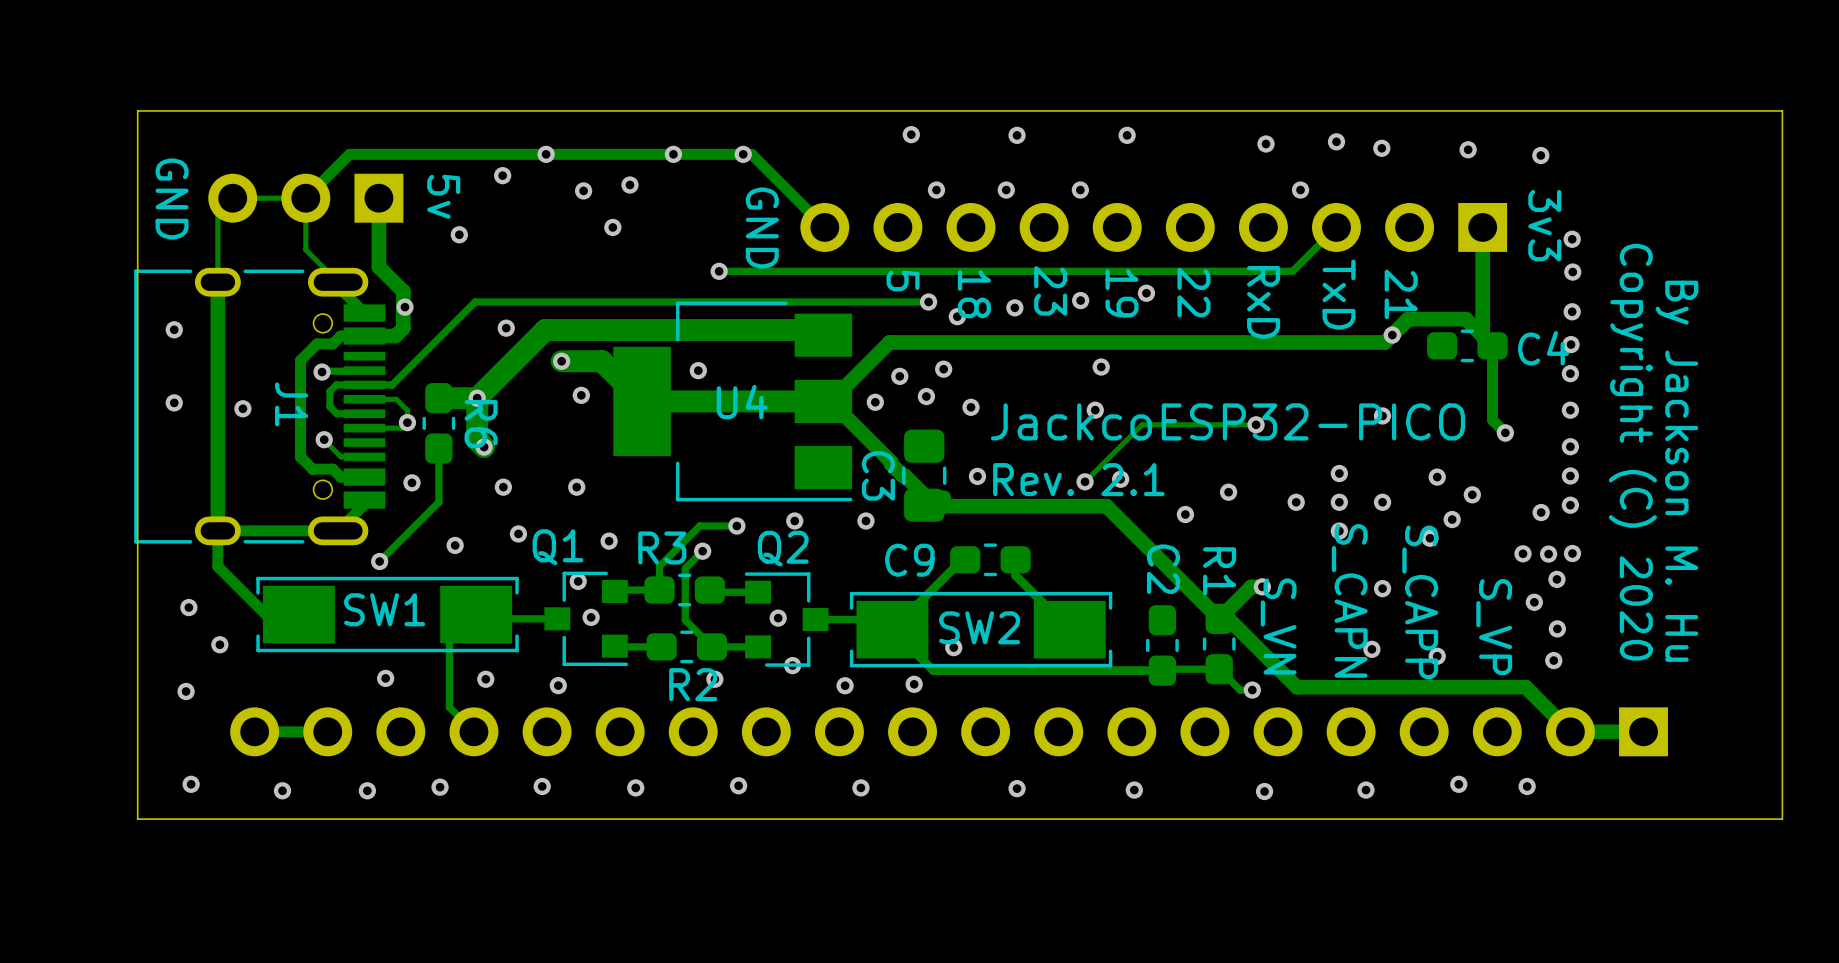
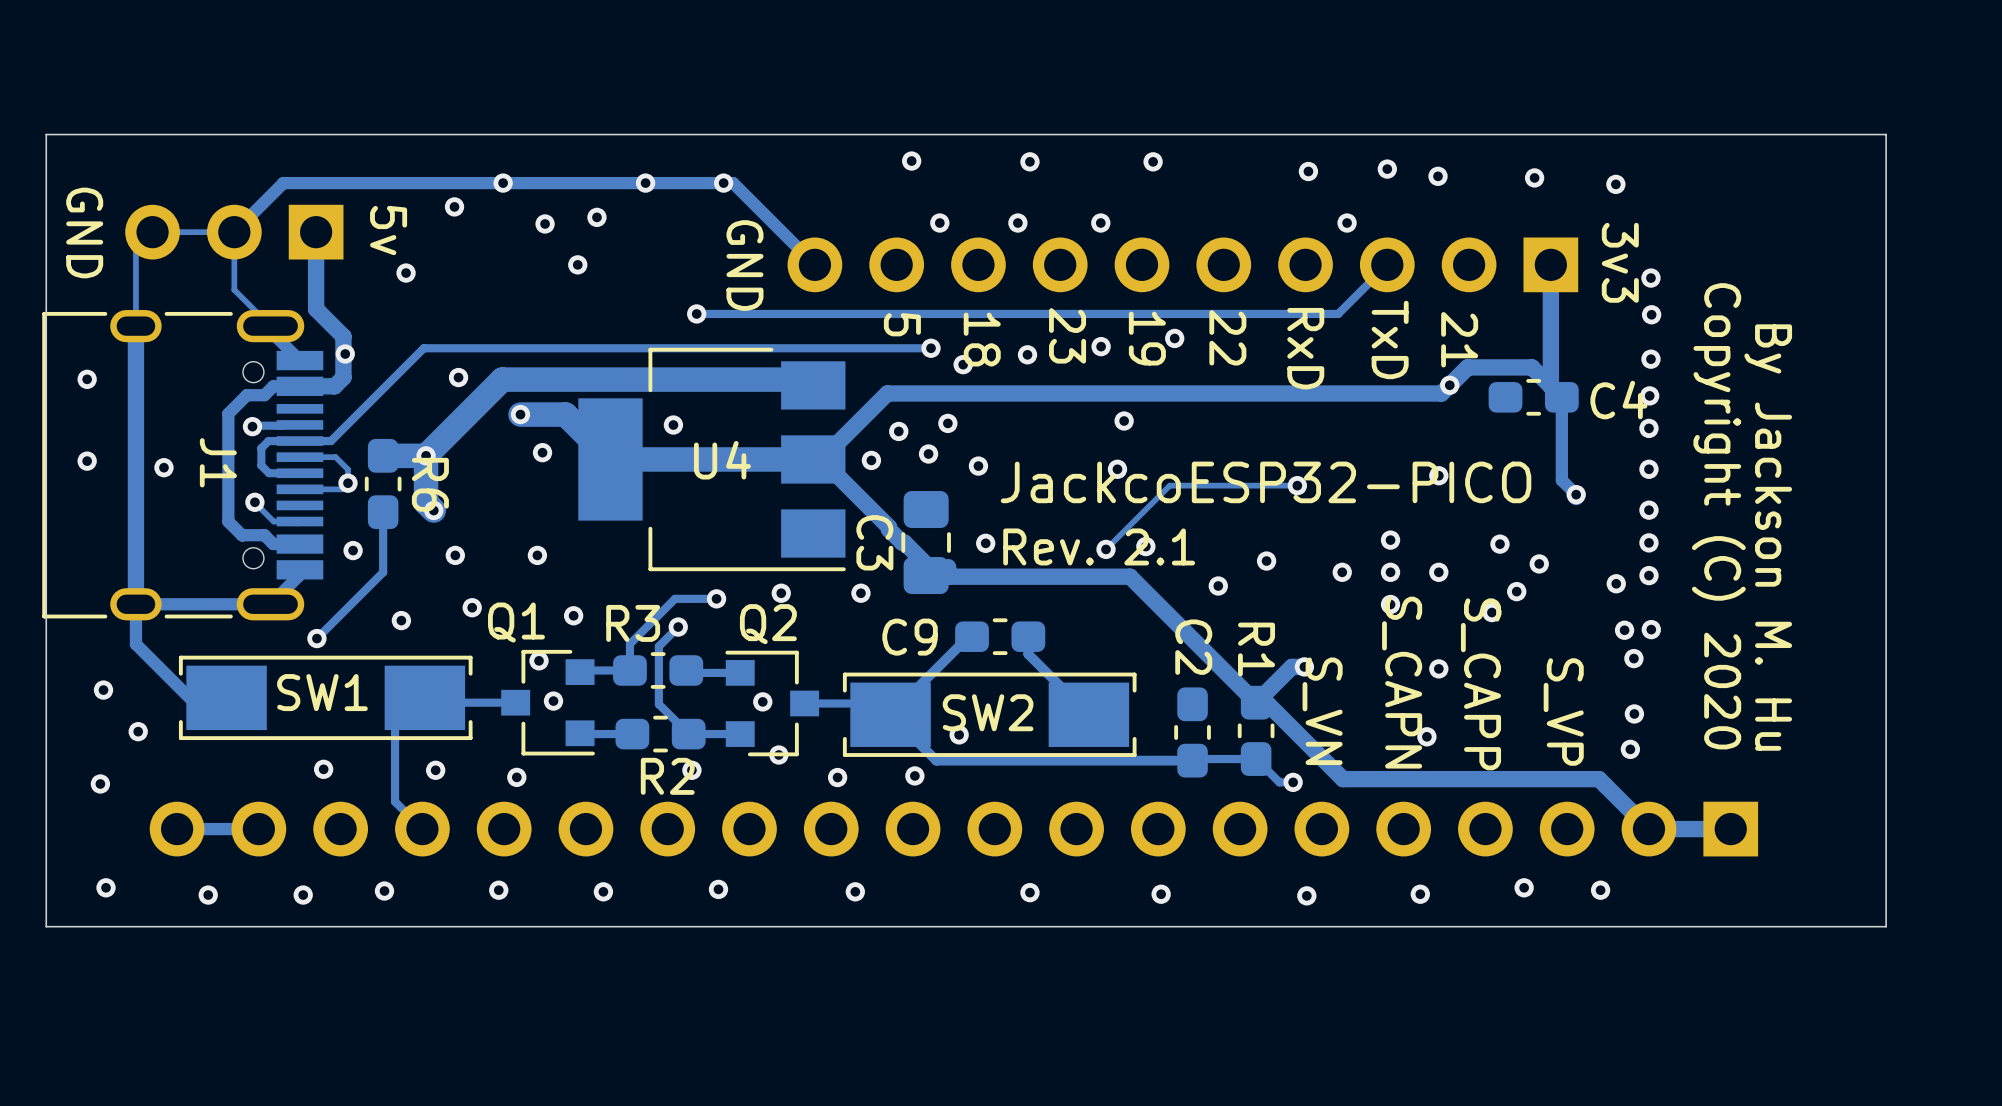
via: (1522, 553) -> none
via: (1534, 602) -> none
via: (1437, 656) -> none

